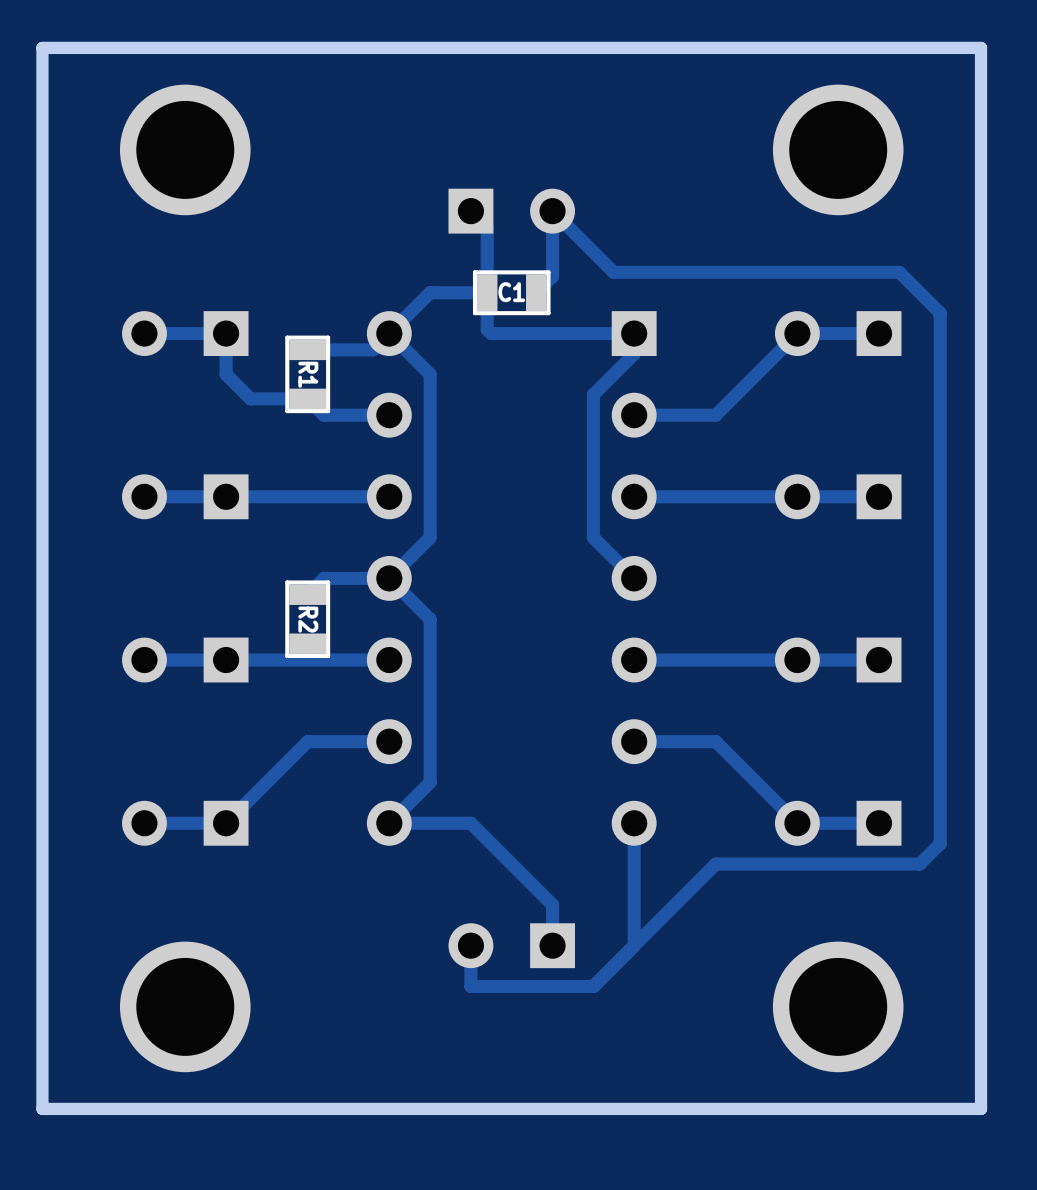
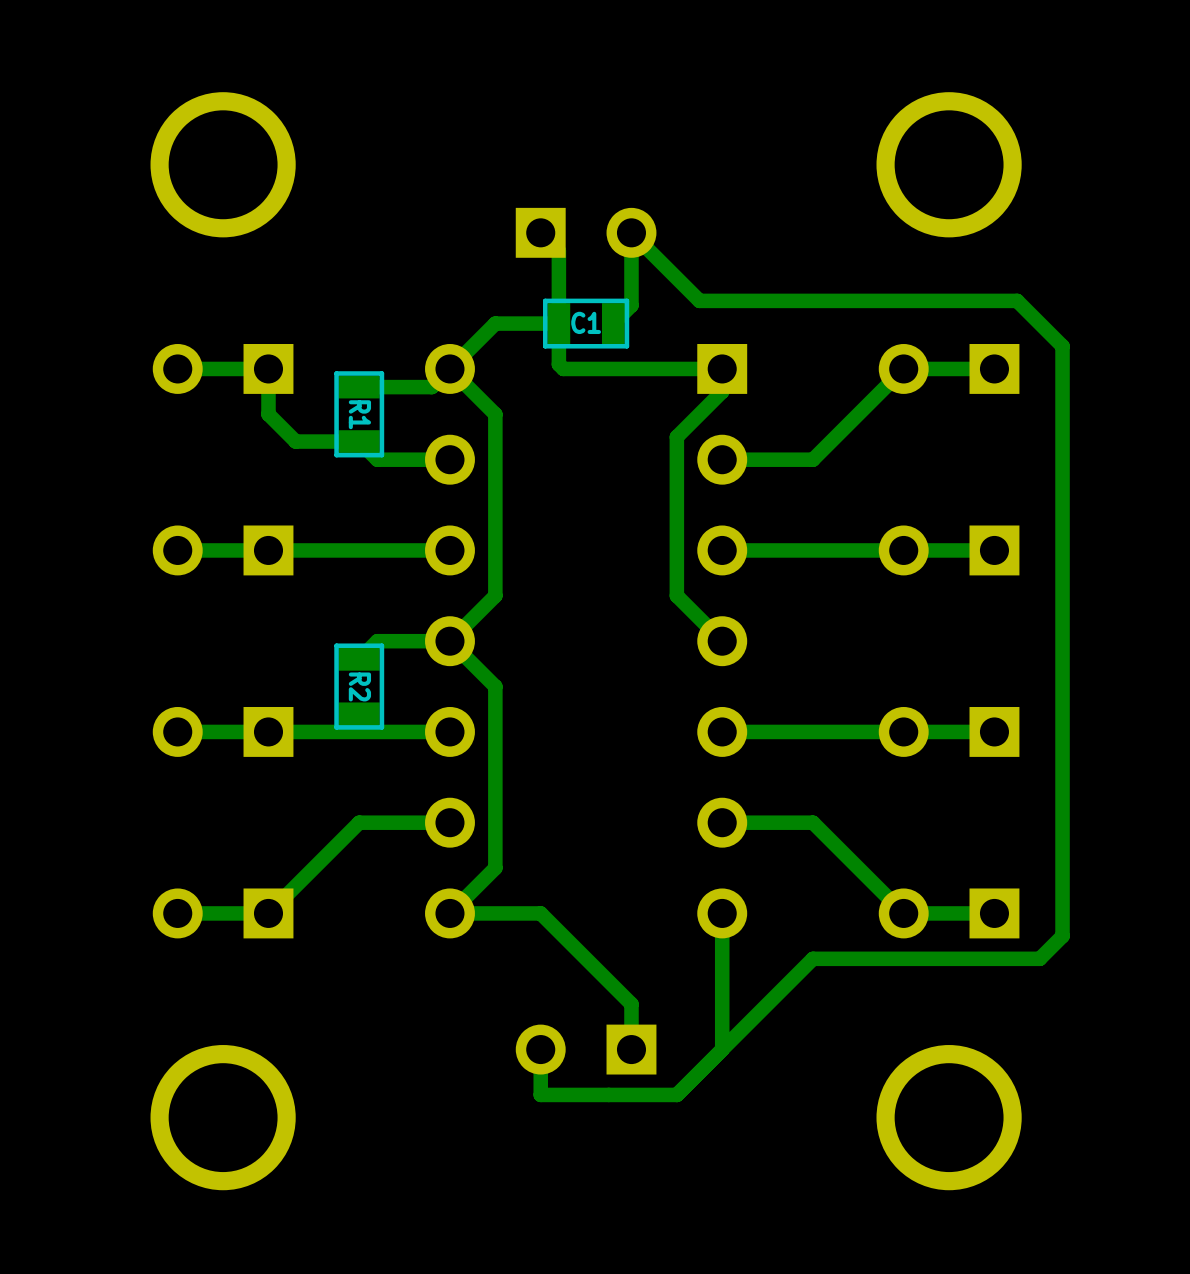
board edge: (981, 47) (981, 1108) (42, 1108) (42, 47) (981, 47) -> none

